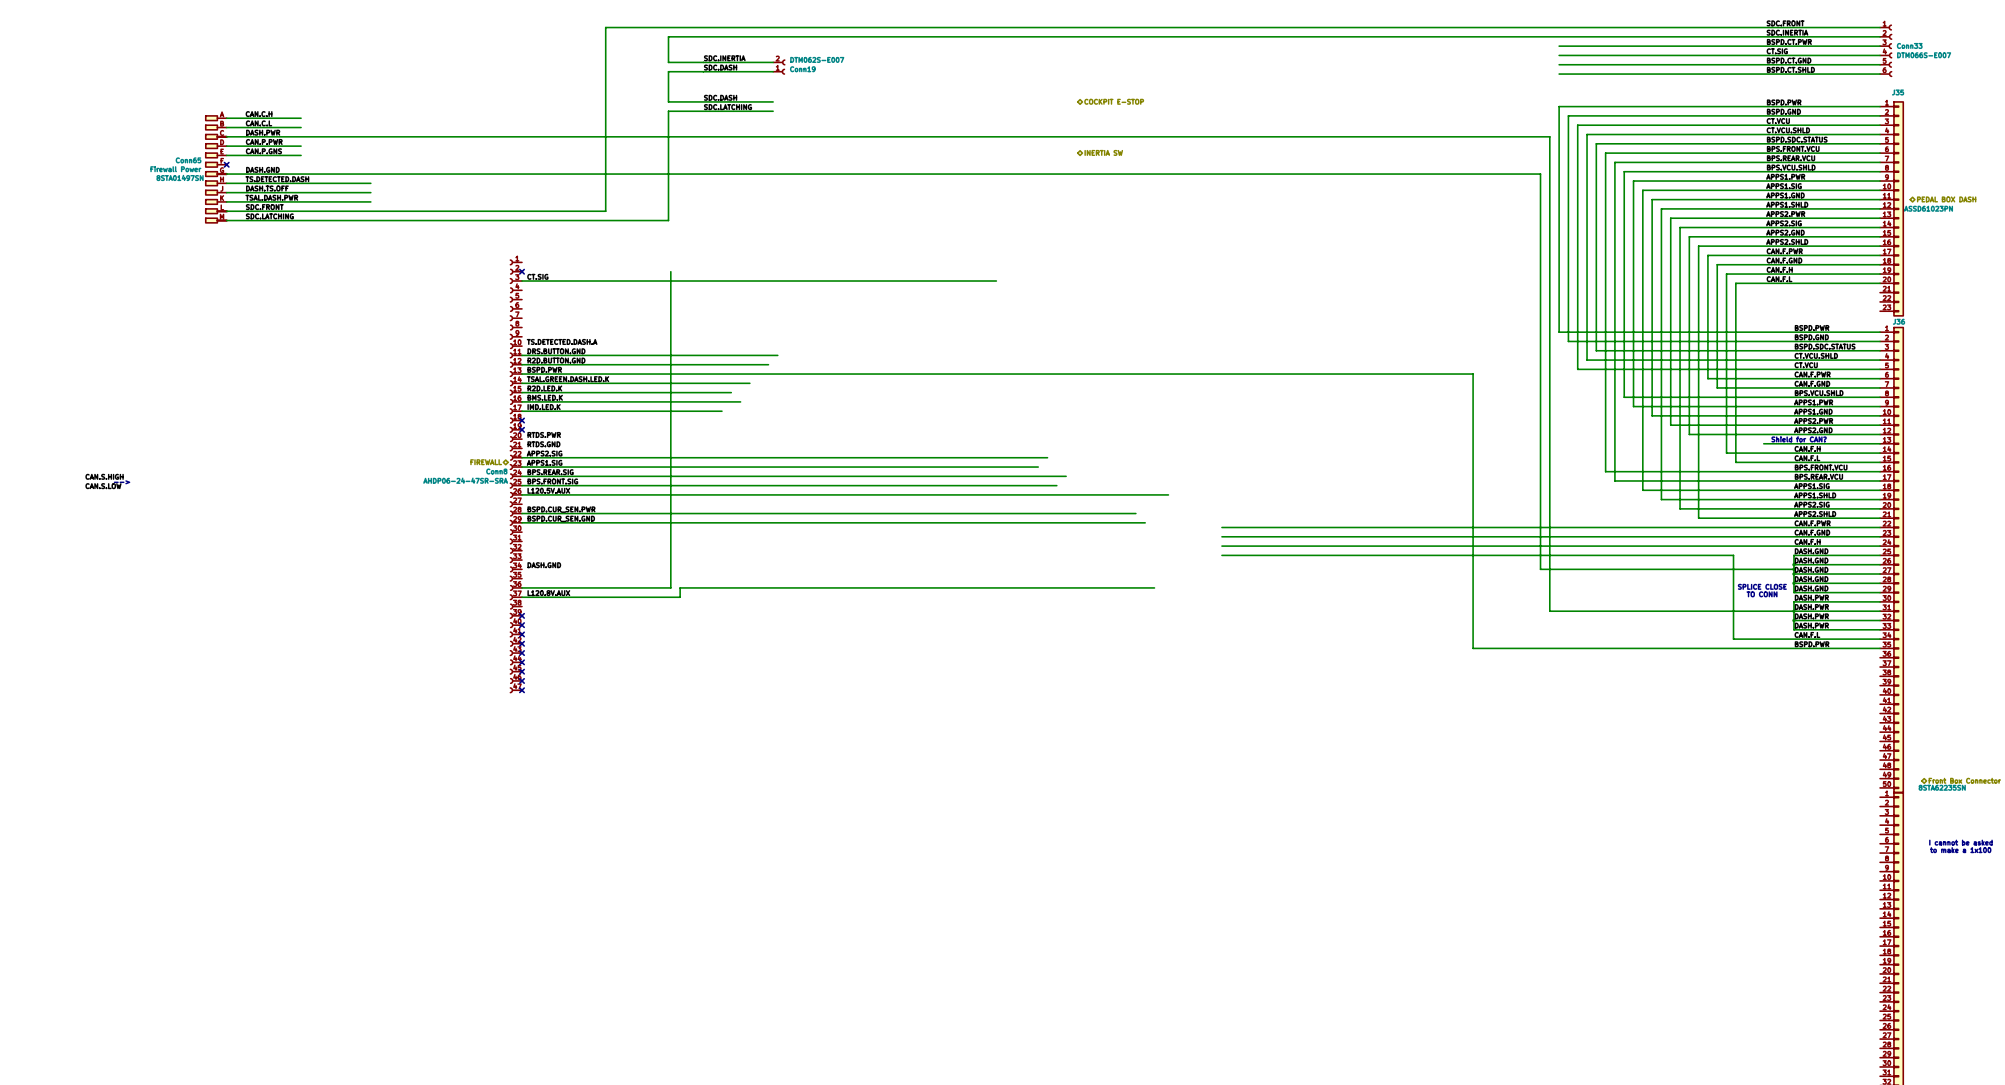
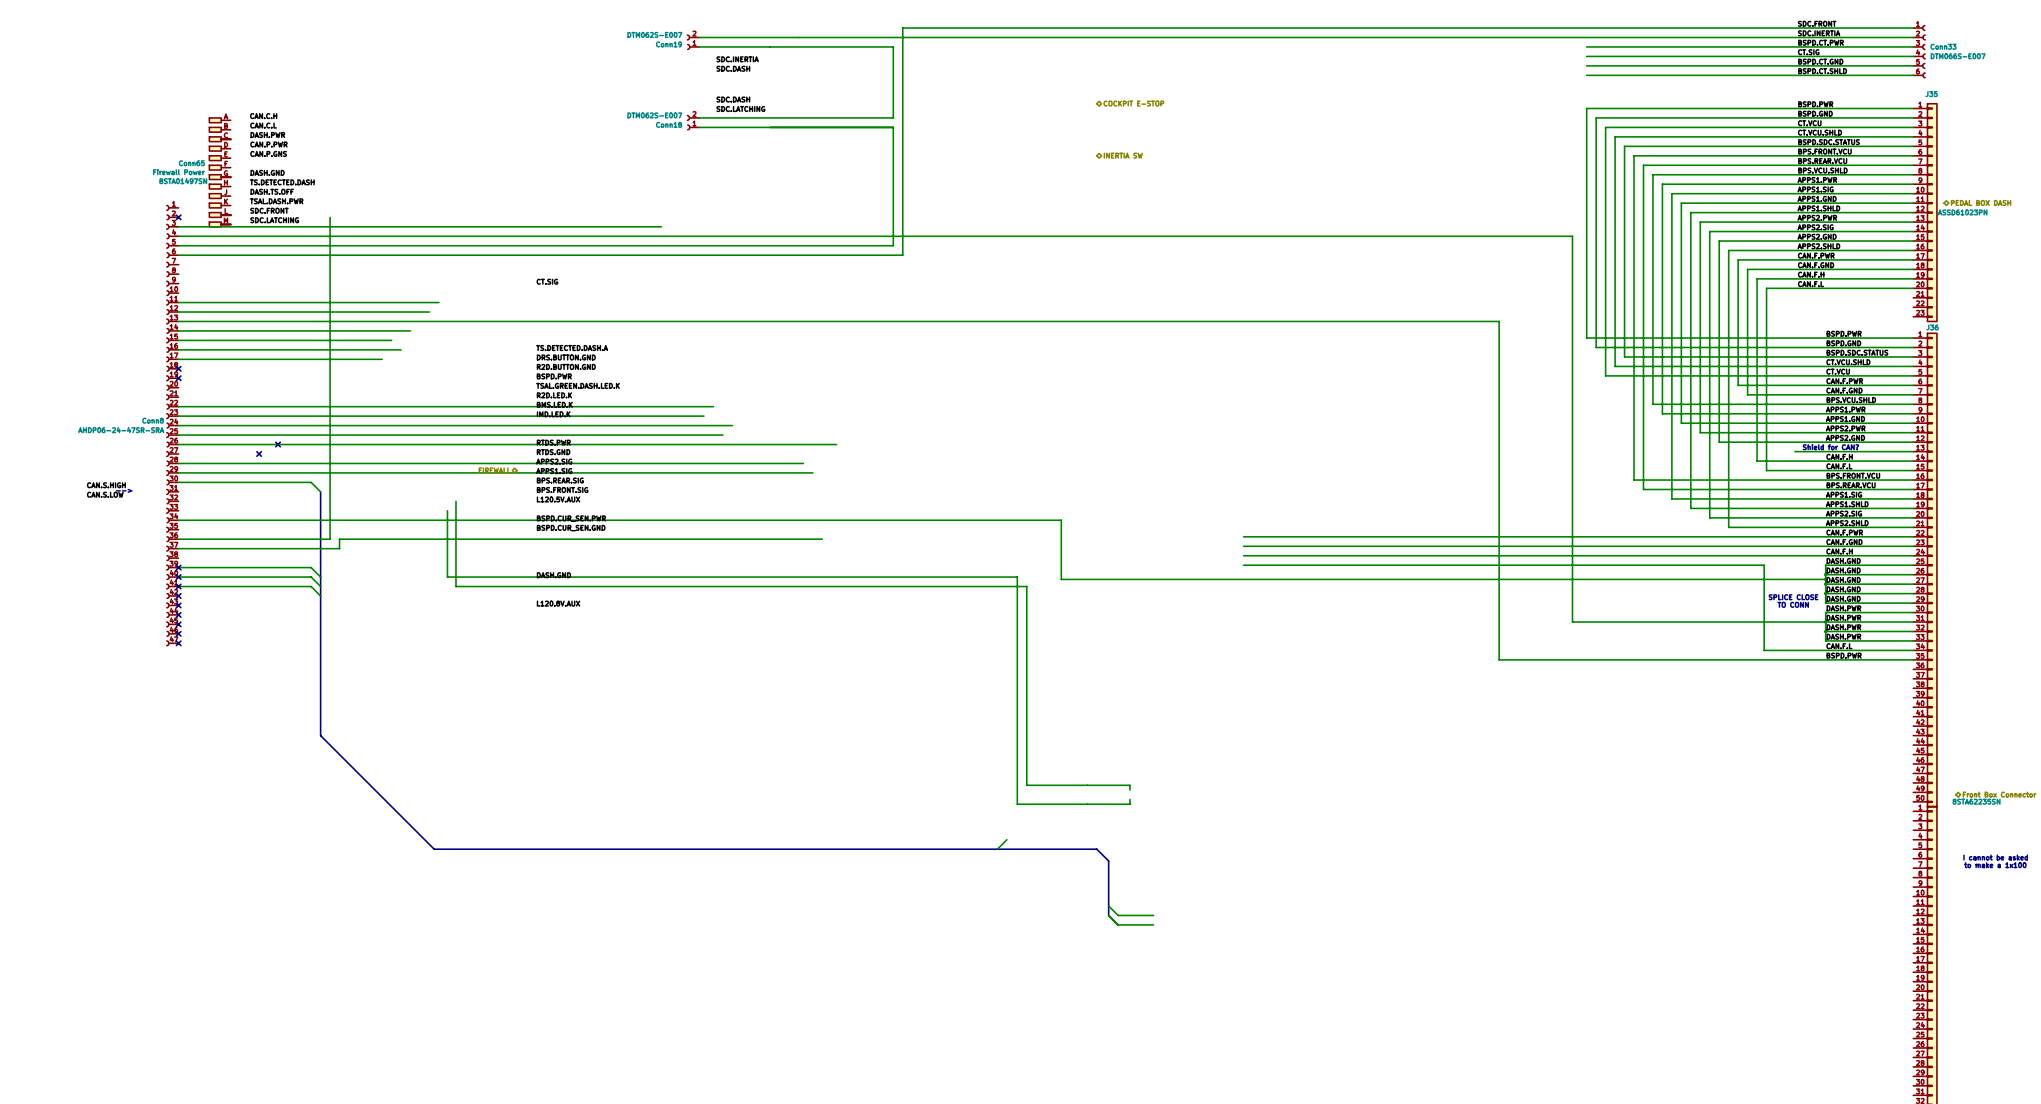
wire: (887, 27) (605, 27) (605, 211) (226, 211) -> (902, 28) (902, 255) (178, 255)
wire: (687, 36) (668, 36) (668, 62) (773, 62) -> none
wire: none -> (699, 46) (893, 46) (893, 117) (699, 117)
part position: (778, 67) -> (693, 42)
part flip: as is (783, 67) -> left-right (688, 42)
wire: (773, 71) (668, 71) (668, 101) (773, 101) -> none
wire: (773, 111) (668, 111) (668, 220) (226, 220) -> none
wire: (226, 118) (301, 118) -> none
part: none -> (693, 122)
wire: none -> (699, 127) (893, 127) (893, 245) (178, 245)
wire: (226, 127) (301, 127) -> none
wire: (226, 136) (1549, 136) (1549, 611) -> (178, 236) (1572, 236) (1572, 622) (1577, 622)
wire: (226, 146) (301, 146) -> none
wire: (226, 155) (301, 155) -> none
no-connect mark: (226, 164) -> none
wire: (226, 174) (1540, 174) (1540, 569) -> (178, 520) (1061, 520) (1061, 579) (1567, 579)
wire: (226, 183) (370, 183) -> none
wire: (226, 192) (370, 192) -> none
wire: (226, 201) (370, 201) -> none
no-connect mark: none -> (178, 217)
wire: none -> (330, 217) (330, 539) (178, 539)
wire: none -> (178, 226) (661, 226)
no-connect mark: (522, 271) -> none
wire: (670, 271) (670, 587) (522, 587) -> none
wire: (522, 281) (996, 281) -> none
wire: none -> (178, 302) (438, 302)
wire: none -> (178, 312) (429, 312)
wire: none -> (178, 330) (410, 330)
wire: none -> (178, 340) (391, 340)
wire: none -> (178, 349) (401, 349)
wire: none -> (178, 359) (382, 359)
wire: (522, 355) (777, 355) -> none
no-connect mark: none -> (178, 368)
wire: (522, 364) (768, 364) -> none
no-connect mark: none -> (178, 378)
wire: (522, 374) (1473, 374) -> (178, 321) (1499, 321) (1499, 380)
wire: (522, 383) (749, 383) -> none
wire: (522, 392) (731, 392) -> none
wire: none -> (178, 406) (713, 406)
wire: (522, 401) (740, 401) -> none
wire: none -> (178, 416) (703, 416)
wire: (522, 411) (721, 411) -> none
wire: none -> (178, 425) (732, 425)
no-connect mark: (522, 420) -> none
wire: none -> (178, 435) (722, 435)
no-connect mark: (522, 429) -> none
wire: none -> (178, 444) (836, 444)
no-connect mark: none -> (278, 444)
no-connect mark: none -> (259, 454)
wire: none -> (178, 463) (803, 463)
wire: (522, 457) (1047, 457) -> none
wire: none -> (178, 472) (812, 472)
wire: (522, 467) (1038, 467) -> none
wire: none -> (178, 482) (311, 482) (320, 491)
part position: (516, 476) -> (172, 425)
wire: (522, 476) (1066, 476) -> none
bus: none -> (320, 491) (320, 735) (434, 849) (1096, 849) (1108, 861) (1108, 915)
wire: (522, 485) (1056, 485) -> none
wire: none -> (455, 501) (455, 586) (1026, 586) (1026, 785) (1129, 785) (1129, 790)
wire: (522, 494) (1168, 494) -> none
wire: none -> (447, 510) (447, 577) (1017, 577) (1017, 804) (1129, 804) (1129, 799)
wire: (522, 513) (1135, 513) -> none
wire: (522, 522) (1145, 522) -> none
wire: none -> (822, 539) (339, 539) (339, 548) (178, 548)
wire: none -> (178, 567) (311, 567) (320, 577)
no-connect mark: none -> (178, 567)
wire: none -> (178, 577) (311, 577) (320, 586)
no-connect mark: none -> (178, 577)
wire: none -> (178, 586) (311, 586) (320, 595)
no-connect mark: none -> (178, 586)
no-connect mark: none -> (178, 595)
wire: (1154, 587) (680, 587) (680, 597) (522, 597) -> none
no-connect mark: none -> (178, 605)
no-connect mark: none -> (178, 614)
no-connect mark: none -> (178, 624)
no-connect mark: (522, 615) -> none
no-connect mark: none -> (178, 633)
no-connect mark: (522, 625) -> none
no-connect mark: none -> (178, 643)
no-connect mark: (522, 634) -> none
no-connect mark: (522, 643) -> none
no-connect mark: (522, 653) -> none
no-connect mark: (522, 662) -> none
no-connect mark: (522, 671) -> none
no-connect mark: (522, 680) -> none
no-connect mark: (522, 690) -> none
wire: none -> (1006, 839) (997, 849)
wire: none -> (1108, 906) (1118, 915) (1153, 915)
wire: none -> (1108, 915) (1118, 924) (1153, 924)

